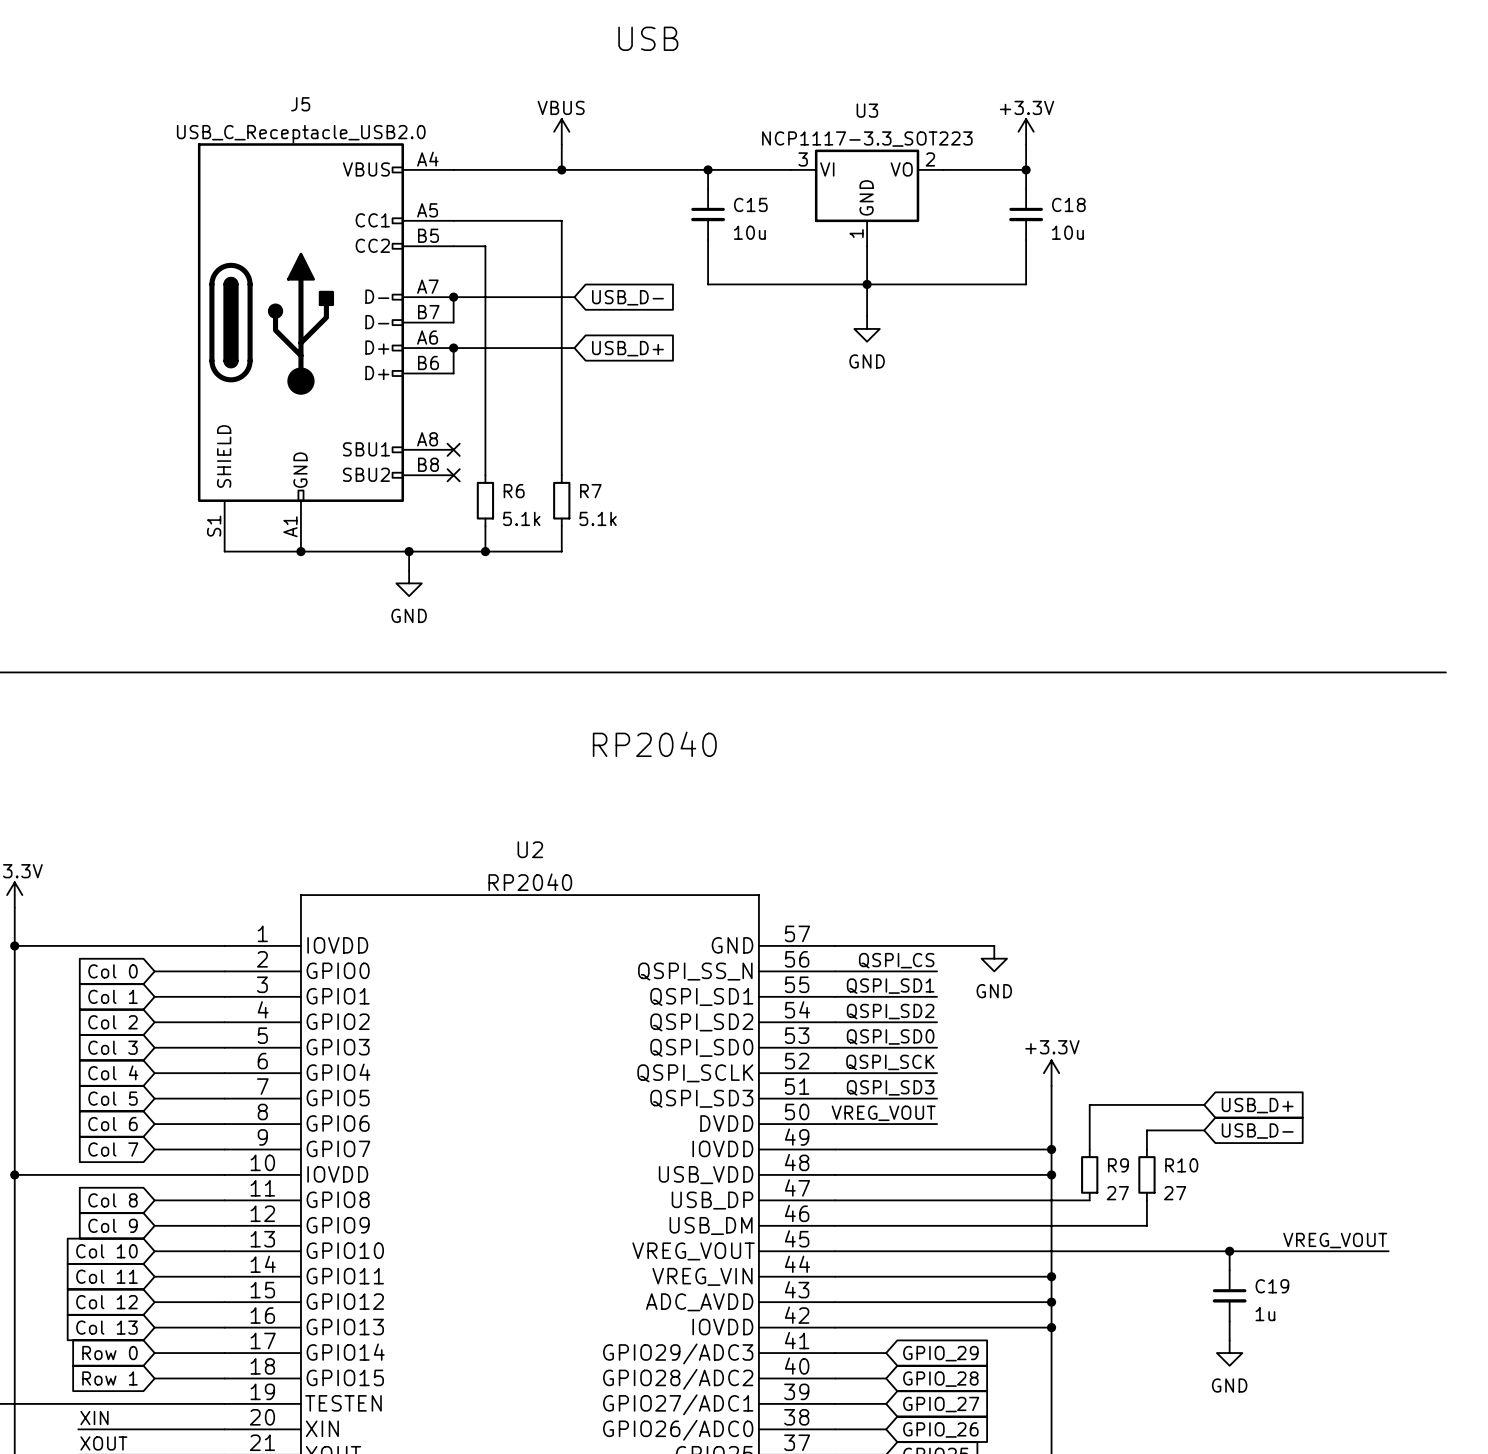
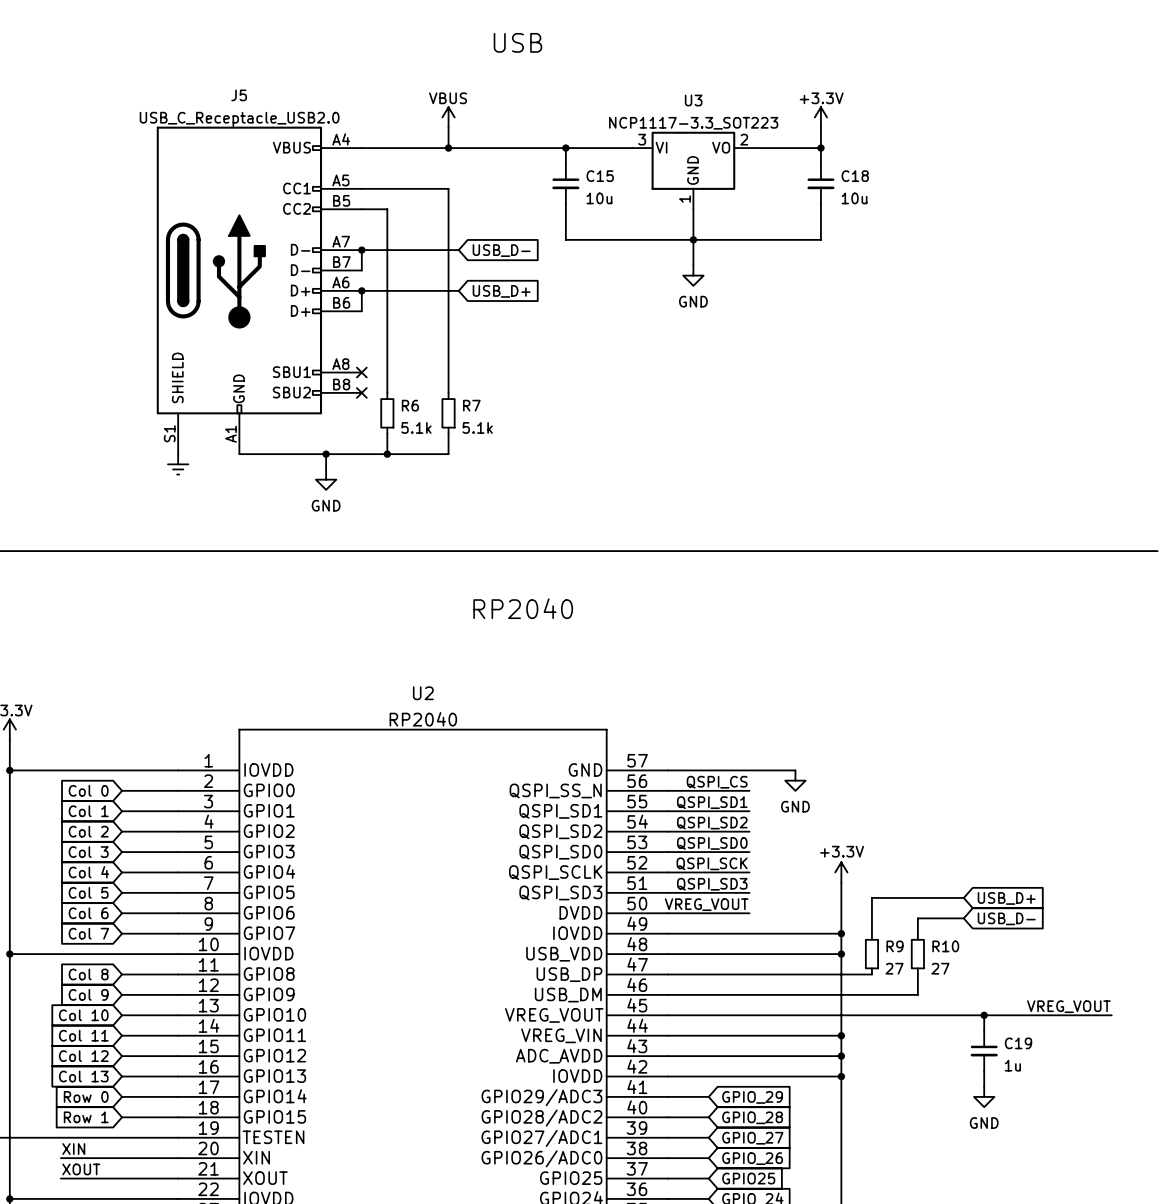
wire: (224, 551) (300, 551) -> none
junction: (300, 551) -> none
power symbol: none -> (178, 464)

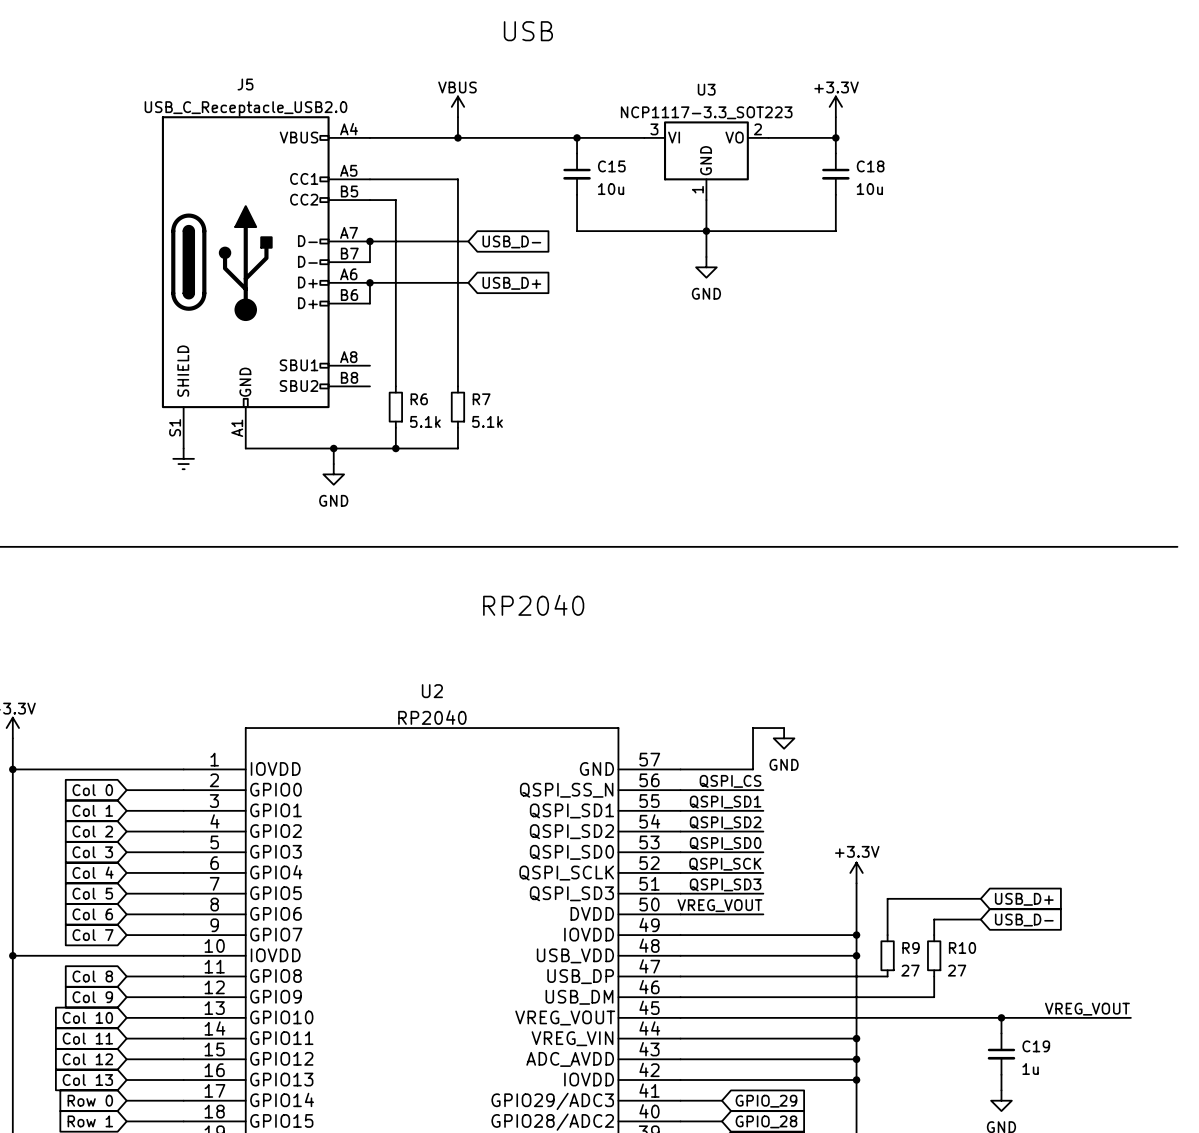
no-connect mark: (361, 372) -> none
no-connect mark: (361, 392) -> none
wire: (739, 770) (795, 770) -> (753, 769) (753, 728) (784, 728)
power symbol position: GND (795, 780) -> GND (784, 738)

